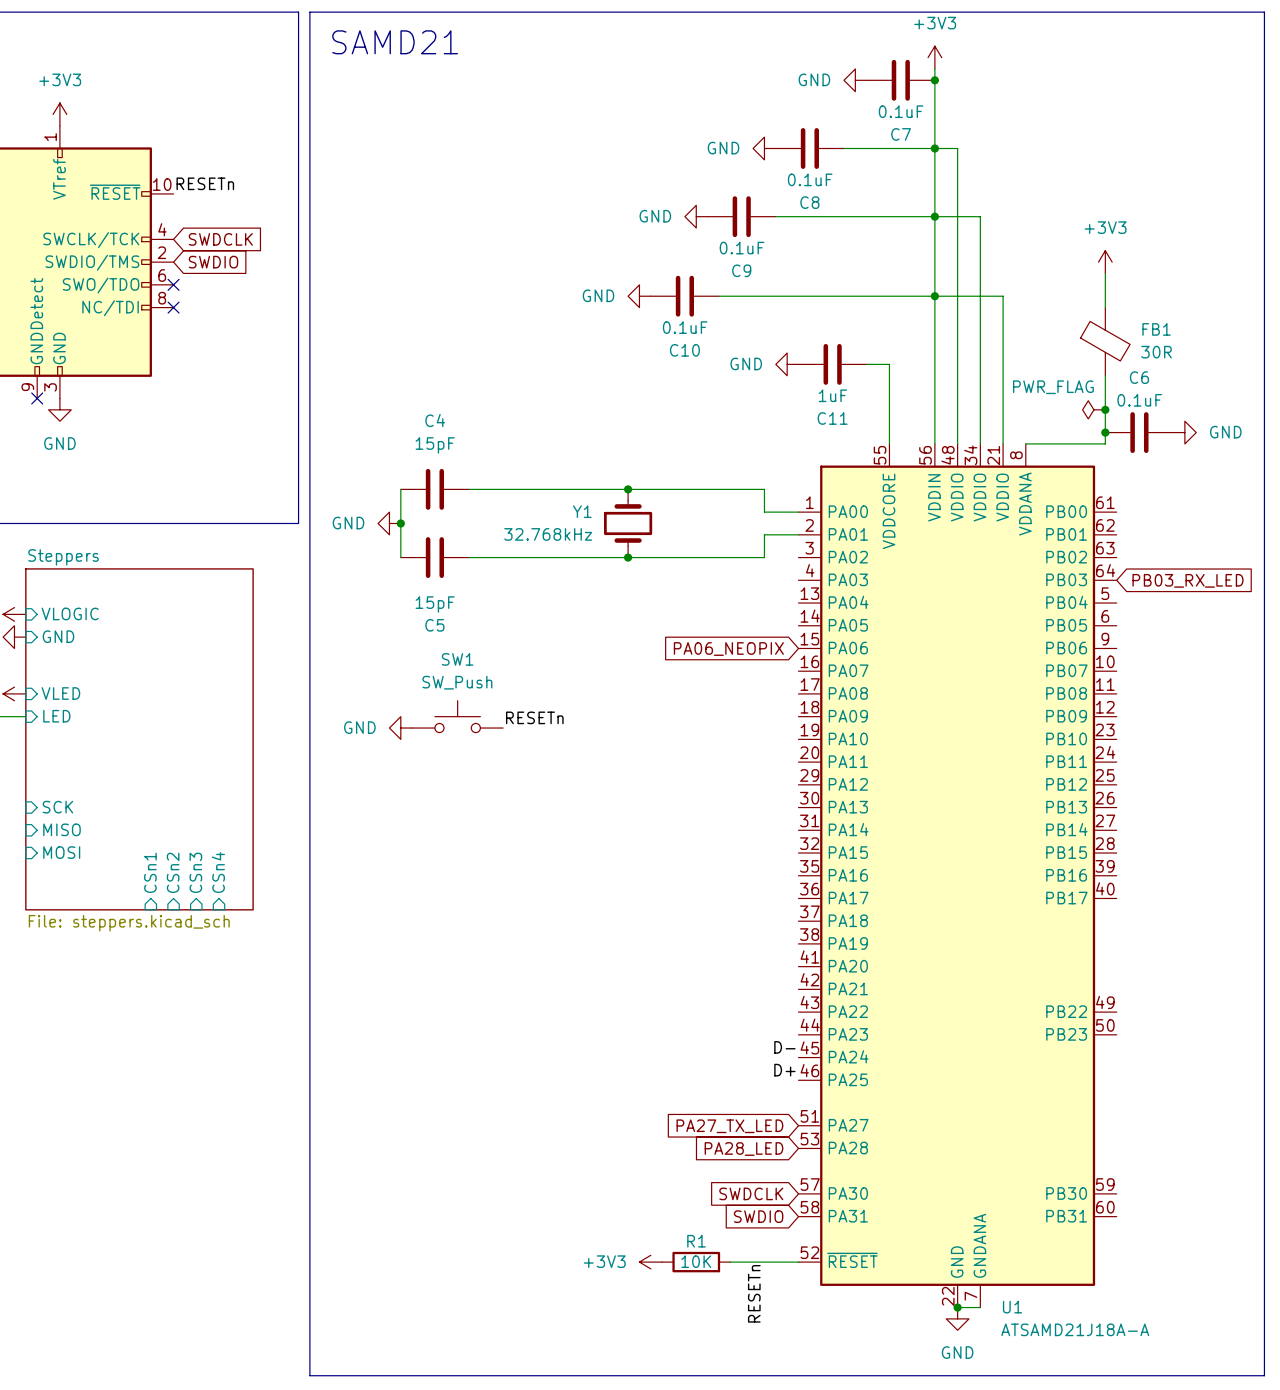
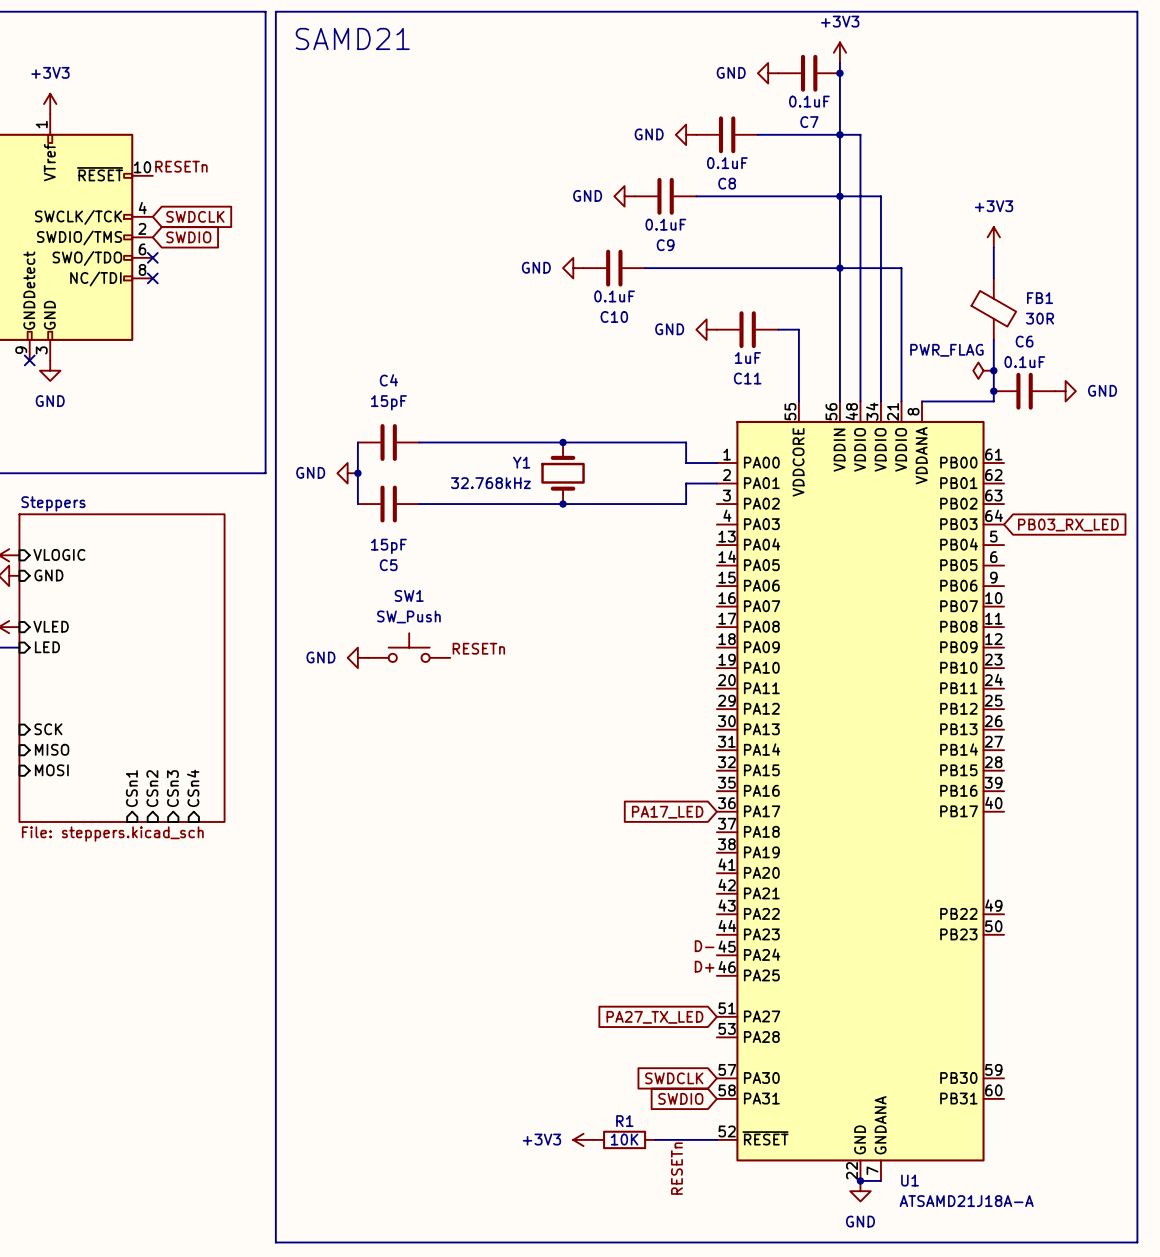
global label: PA06_NEOPIX (728, 649) -> none
global label: none -> PA17_LED (667, 812)
global label: PA28_LED (744, 1149) -> none

